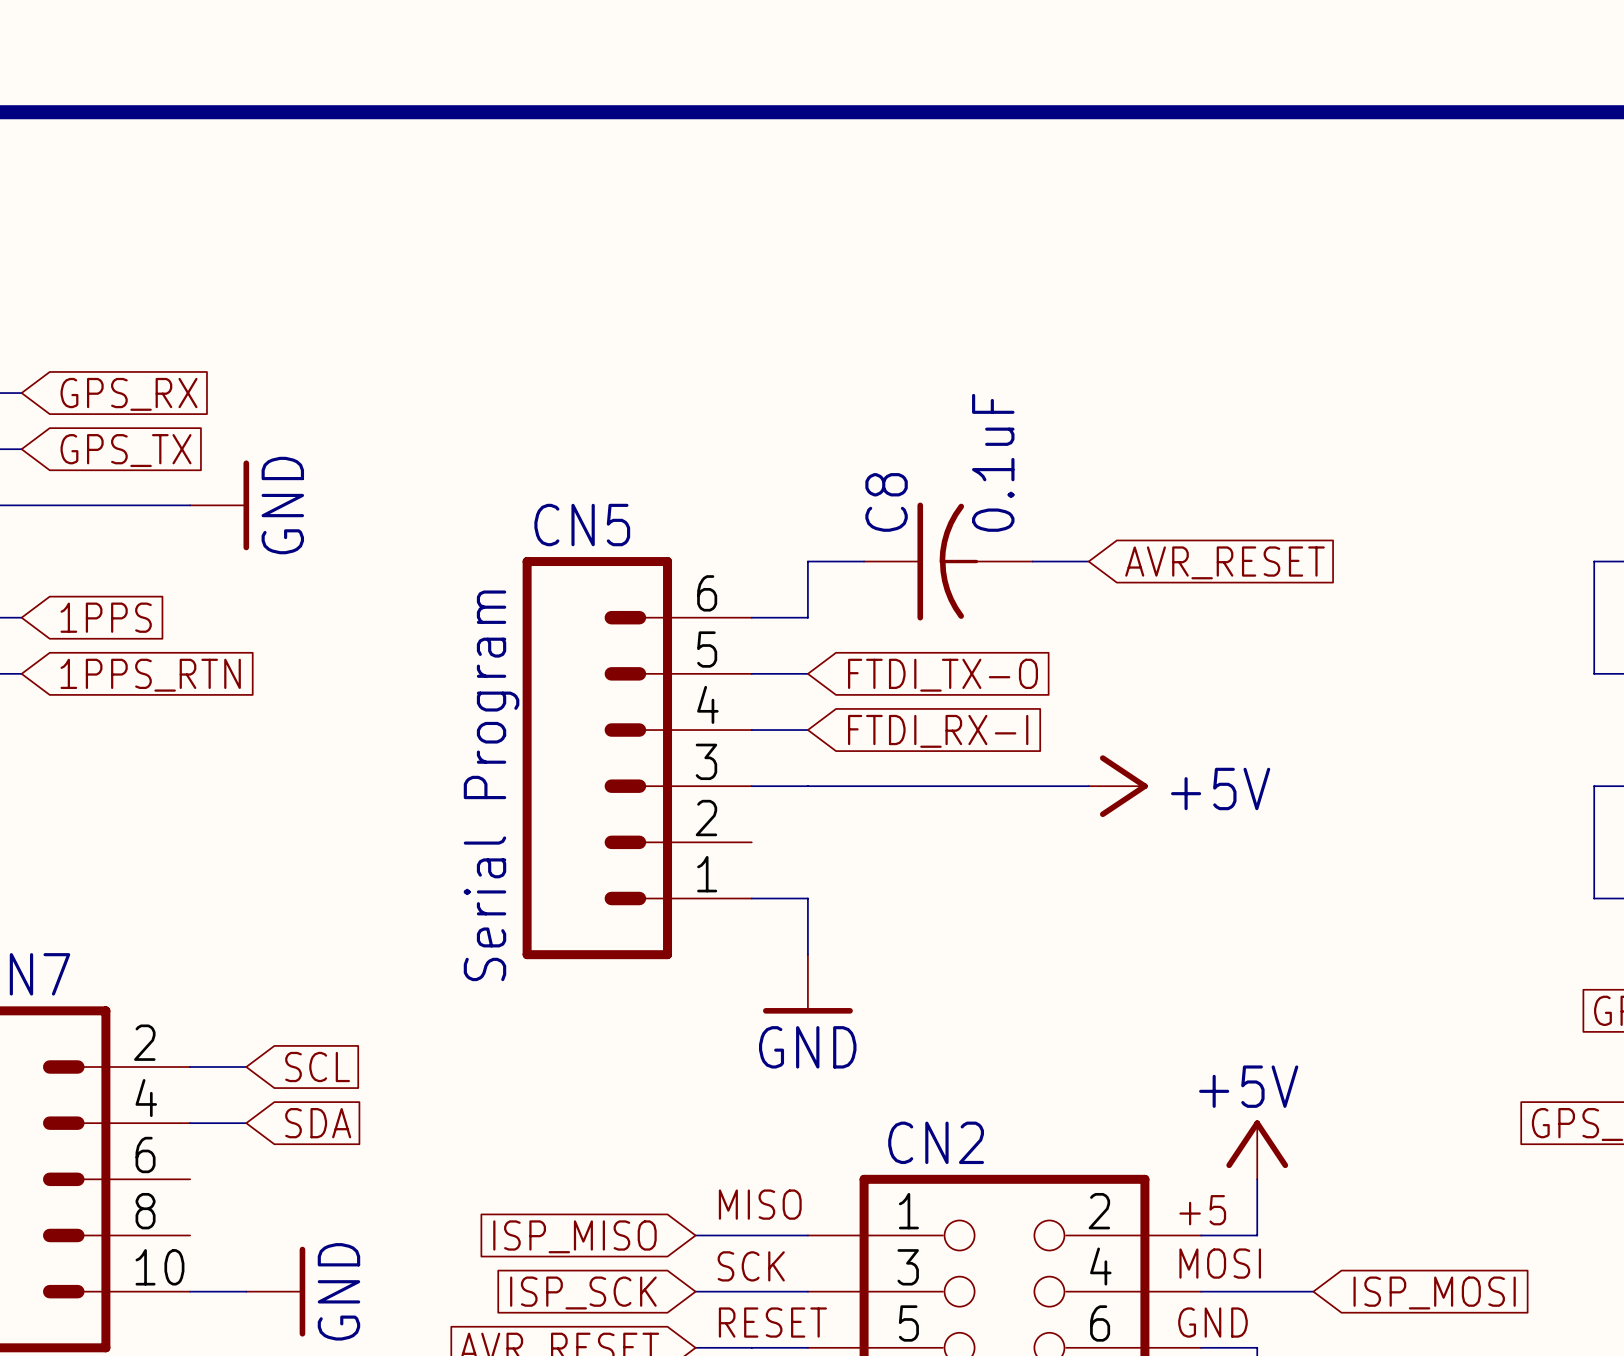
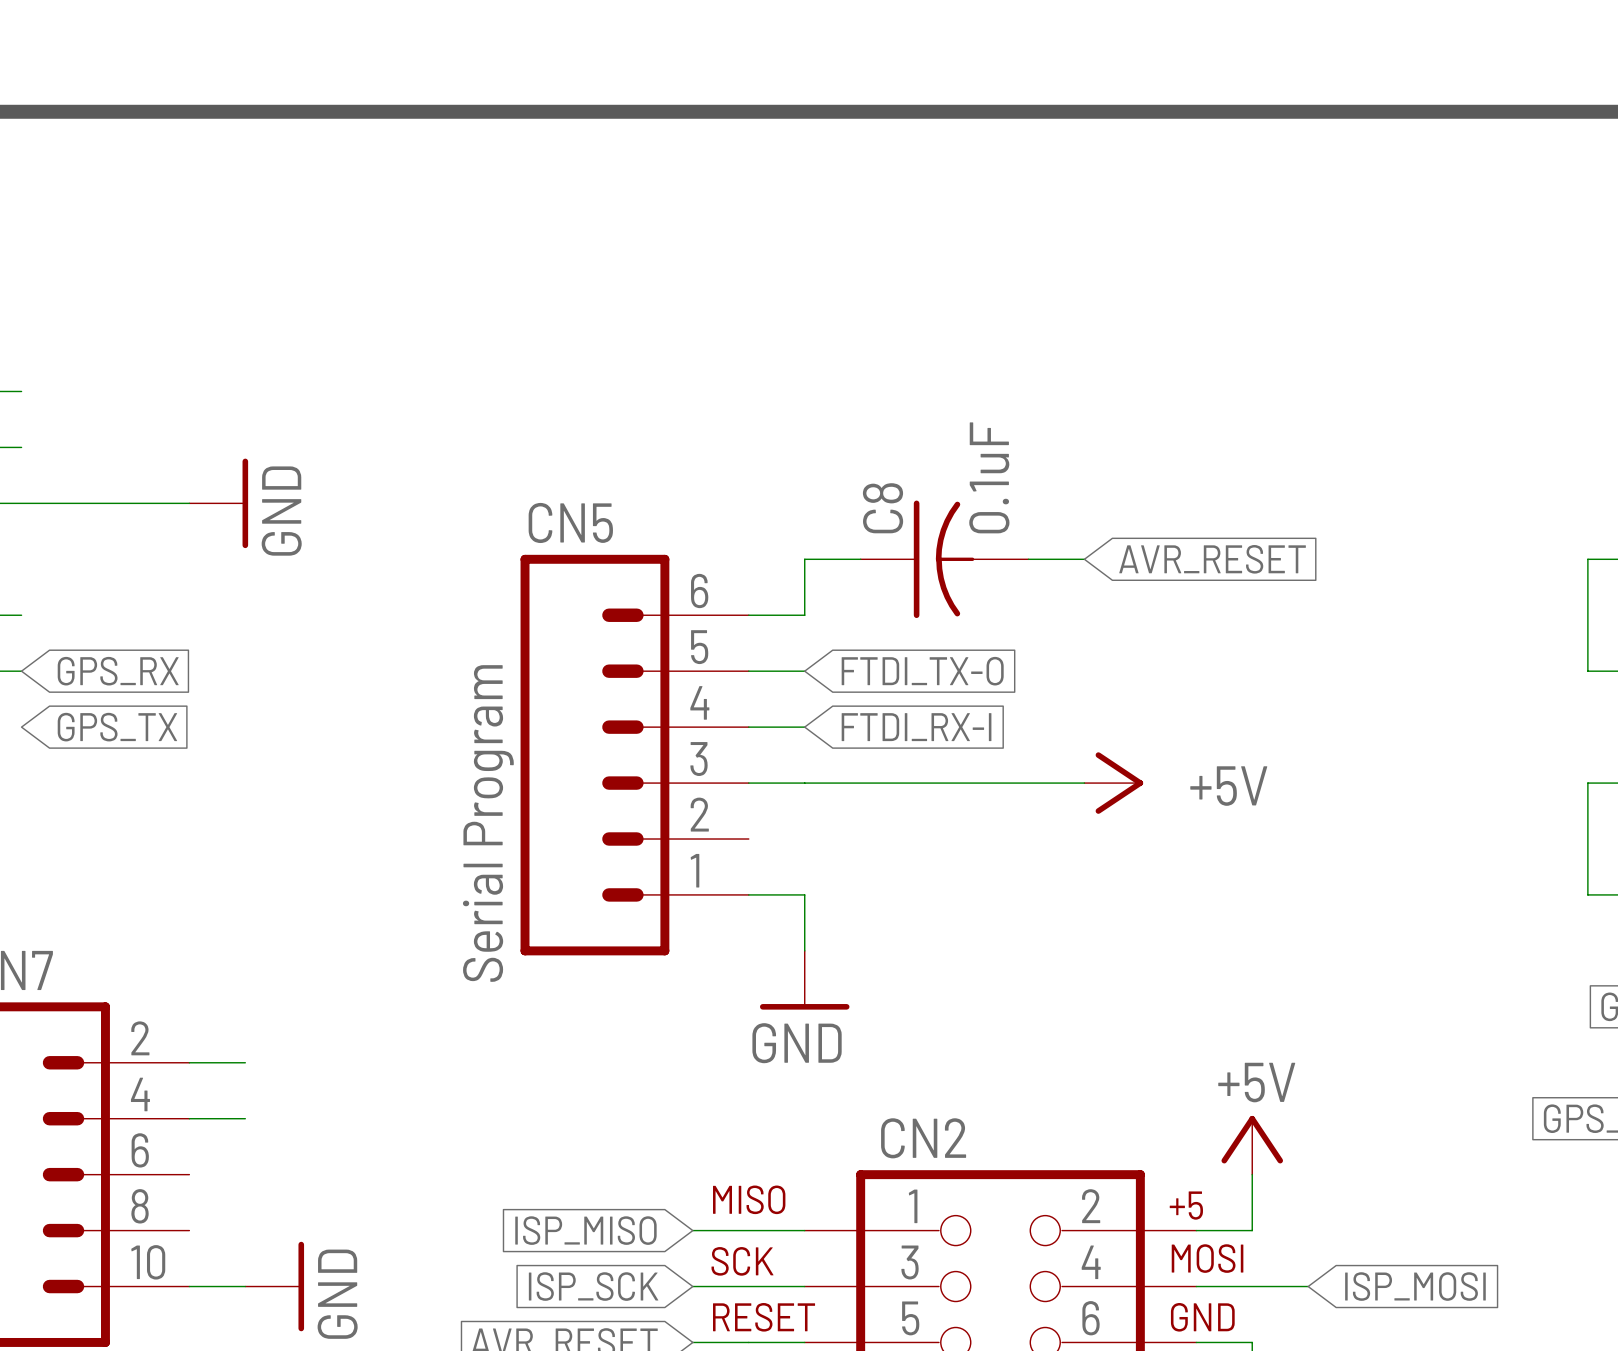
global label: GPS_RX (129, 394) -> none
global label position: GPS_TX (126, 450) -> GPS_TX (117, 727)
global label: 1PPS (106, 617) -> none
global label: 1PPS_RTN (150, 675) -> GPS_RX (118, 671)
global label: SCL (317, 1067) -> none
global label: SDA (318, 1123) -> none

